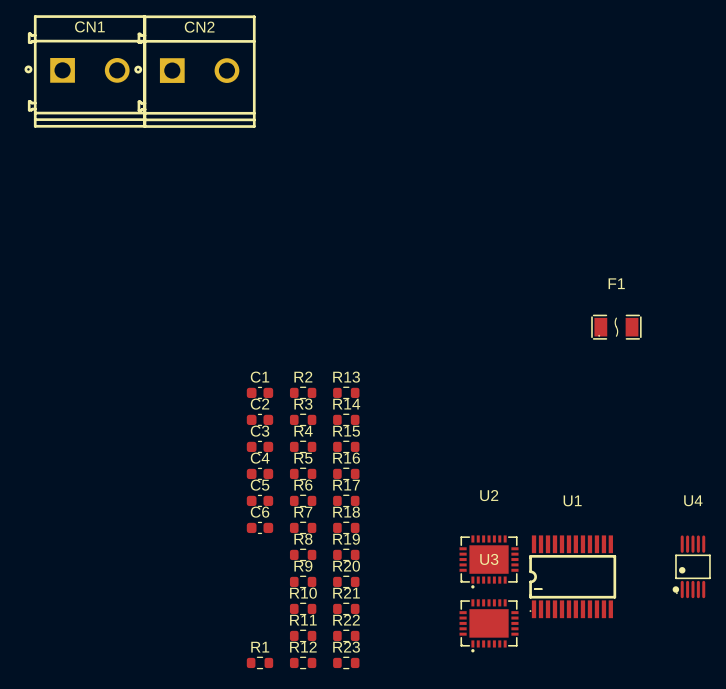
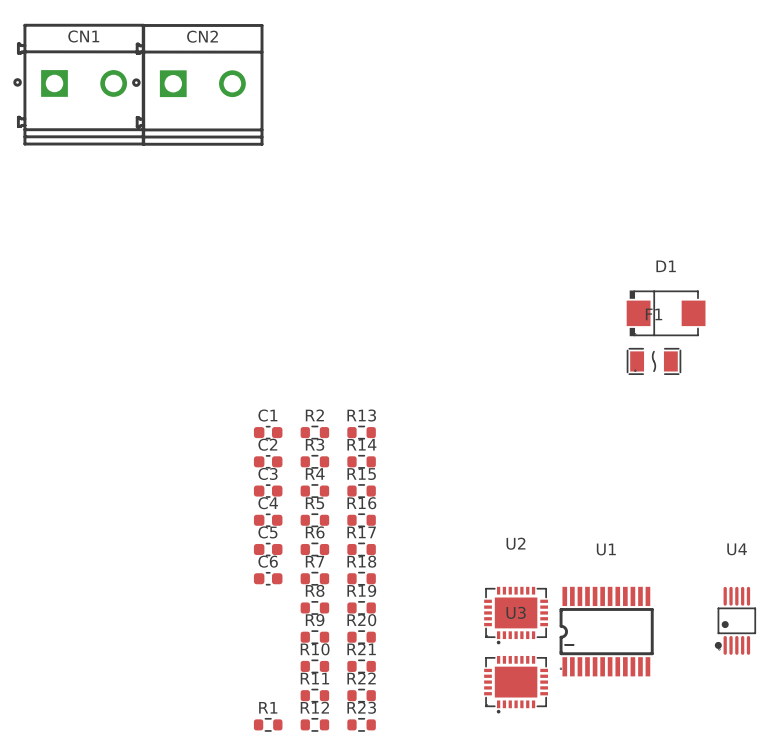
D1: none -> (666, 313)

